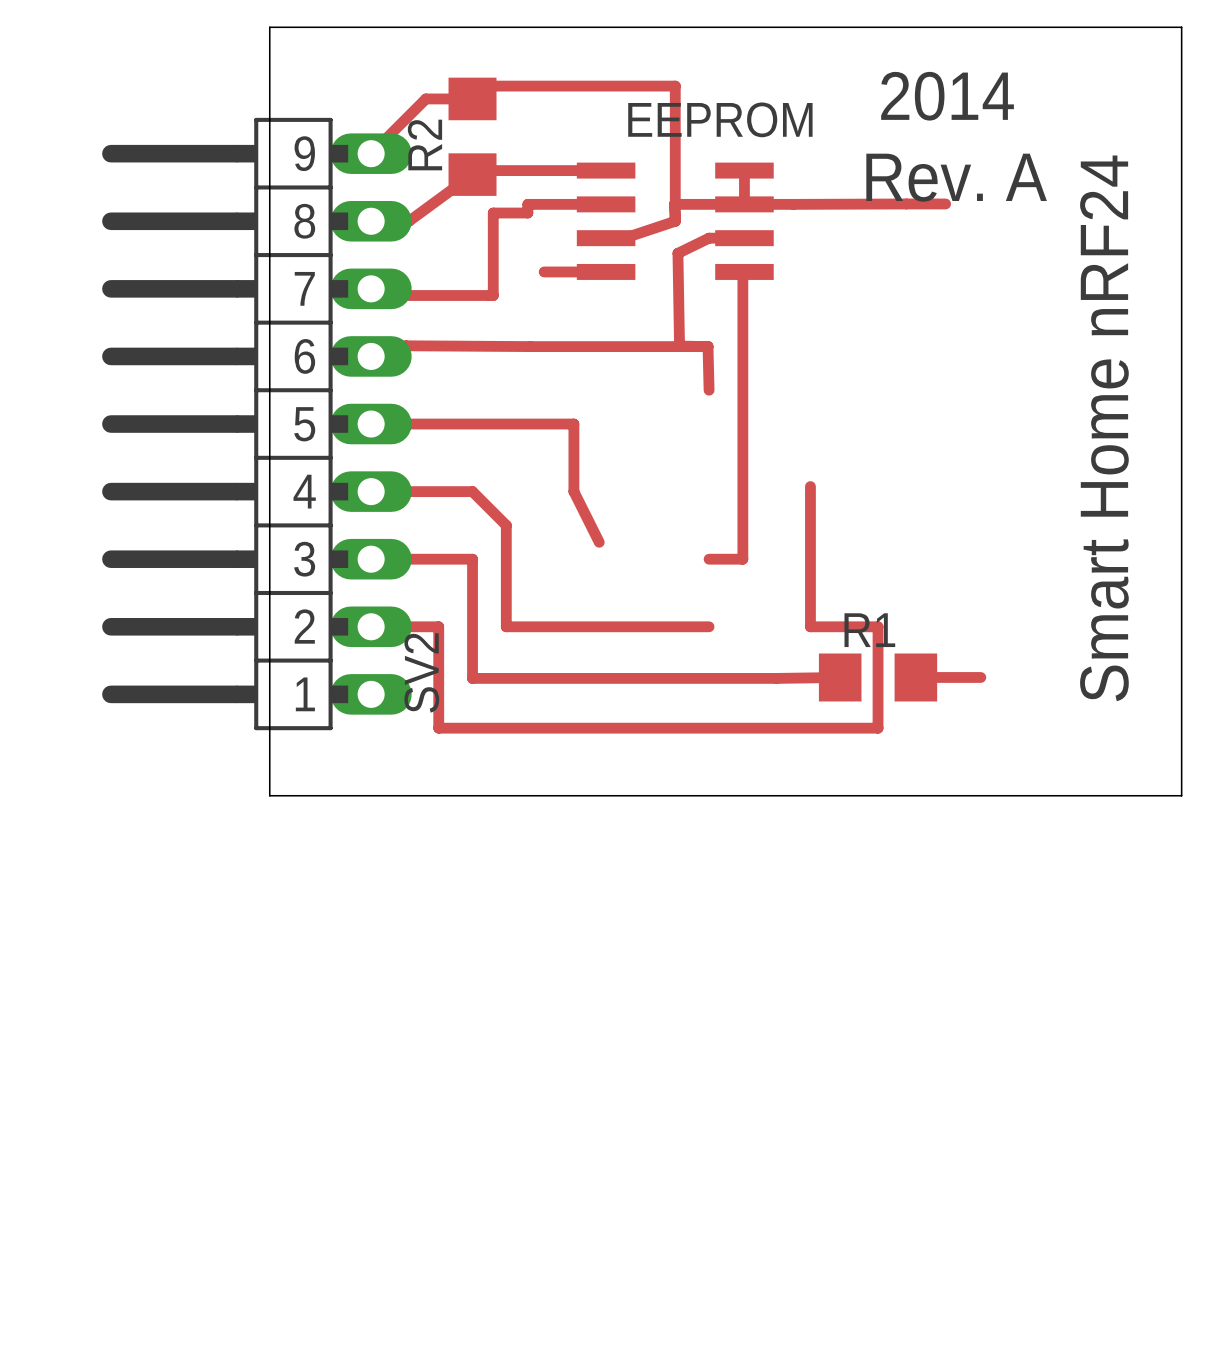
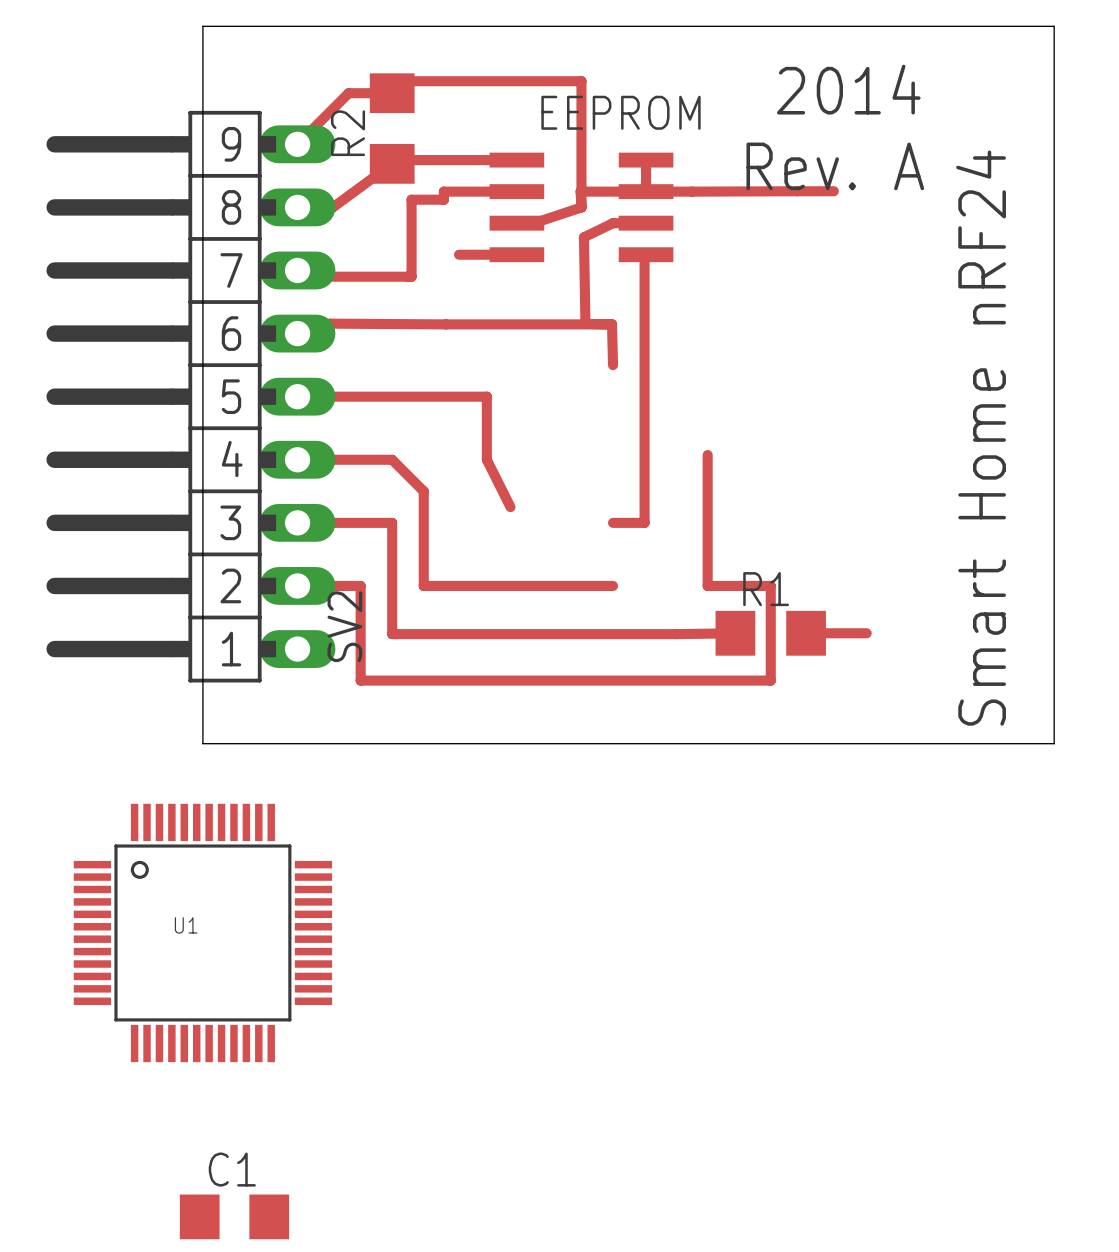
U1: none -> (202, 932)
C1: none -> (234, 1216)

